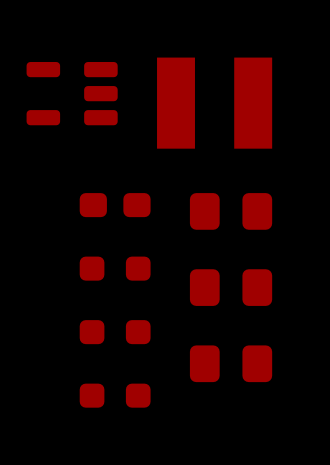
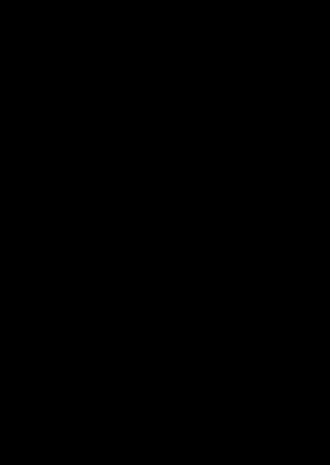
part: (72, 93) -> none
part: (214, 103) -> none
part: (115, 205) -> none
part: (231, 211) -> none
part: (115, 268) -> none
part: (231, 287) -> none
part: (115, 332) -> none
part: (231, 363) -> none
part: (115, 395) -> none

